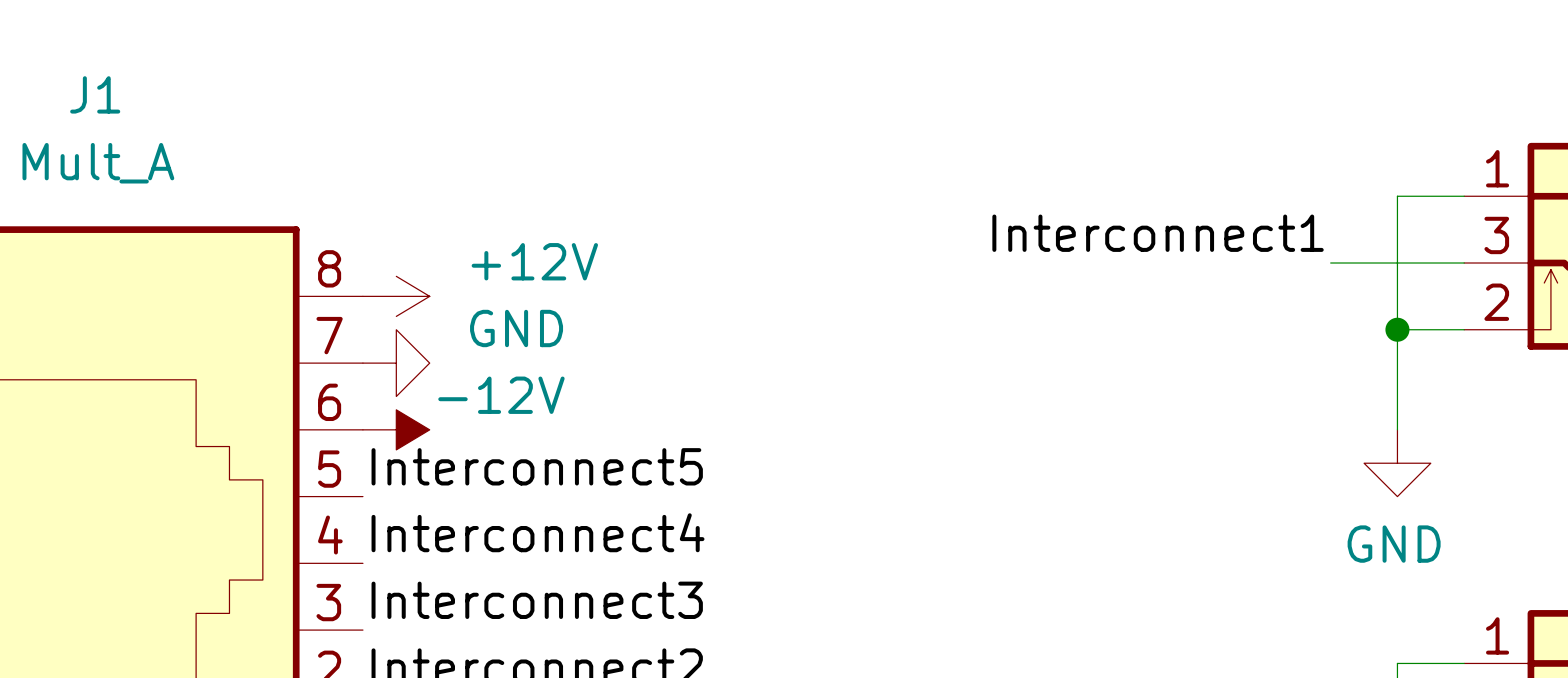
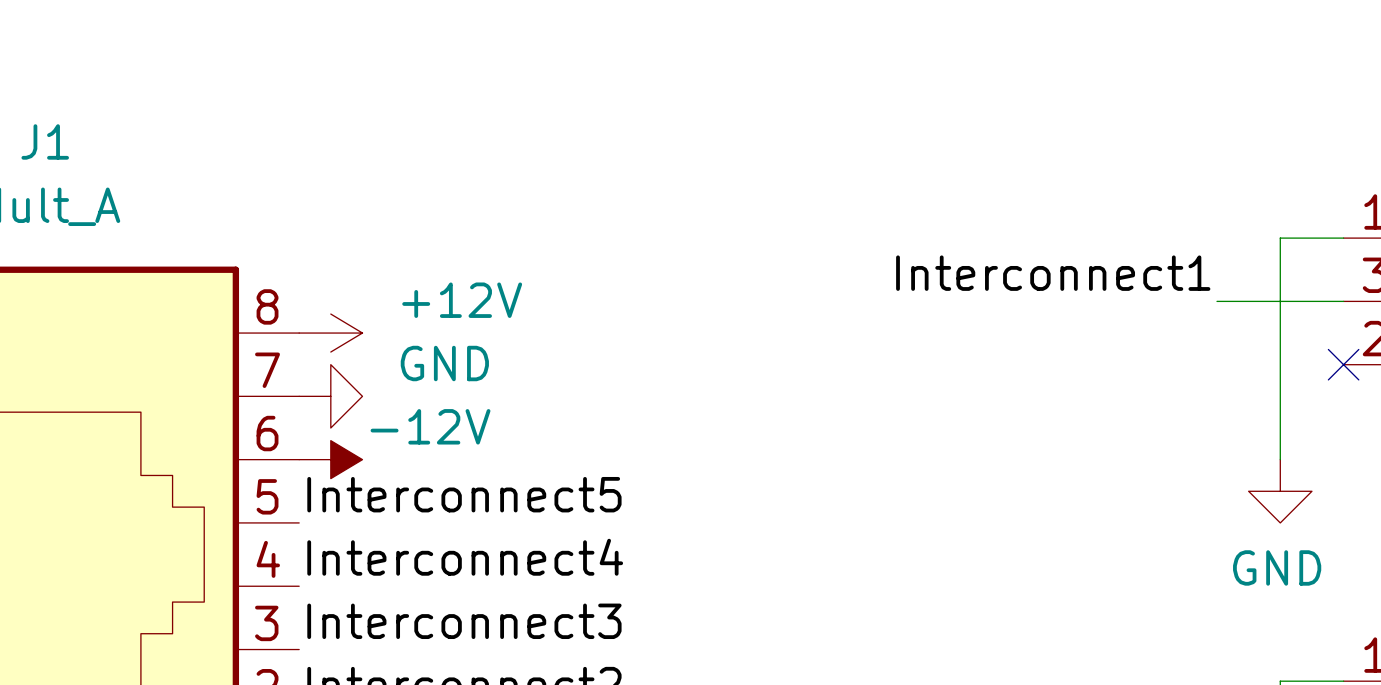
wire: (1397, 329) (1464, 329) -> none
junction: (1397, 329) -> none
no-connect mark: none -> (1343, 364)

